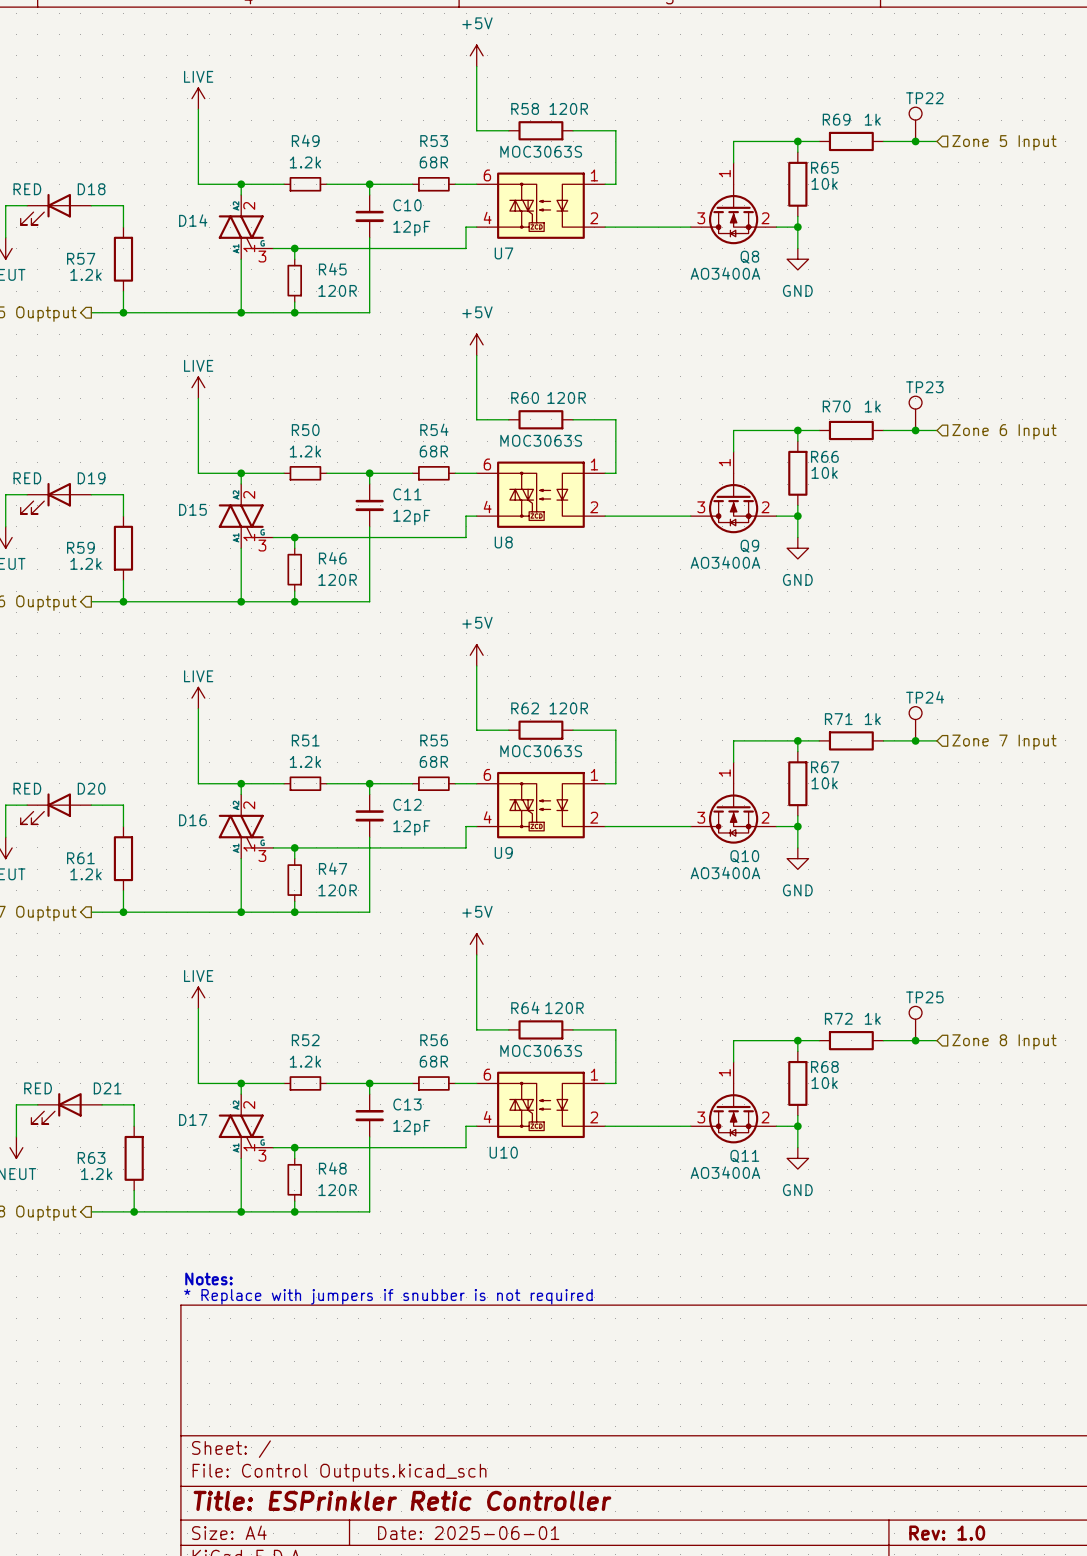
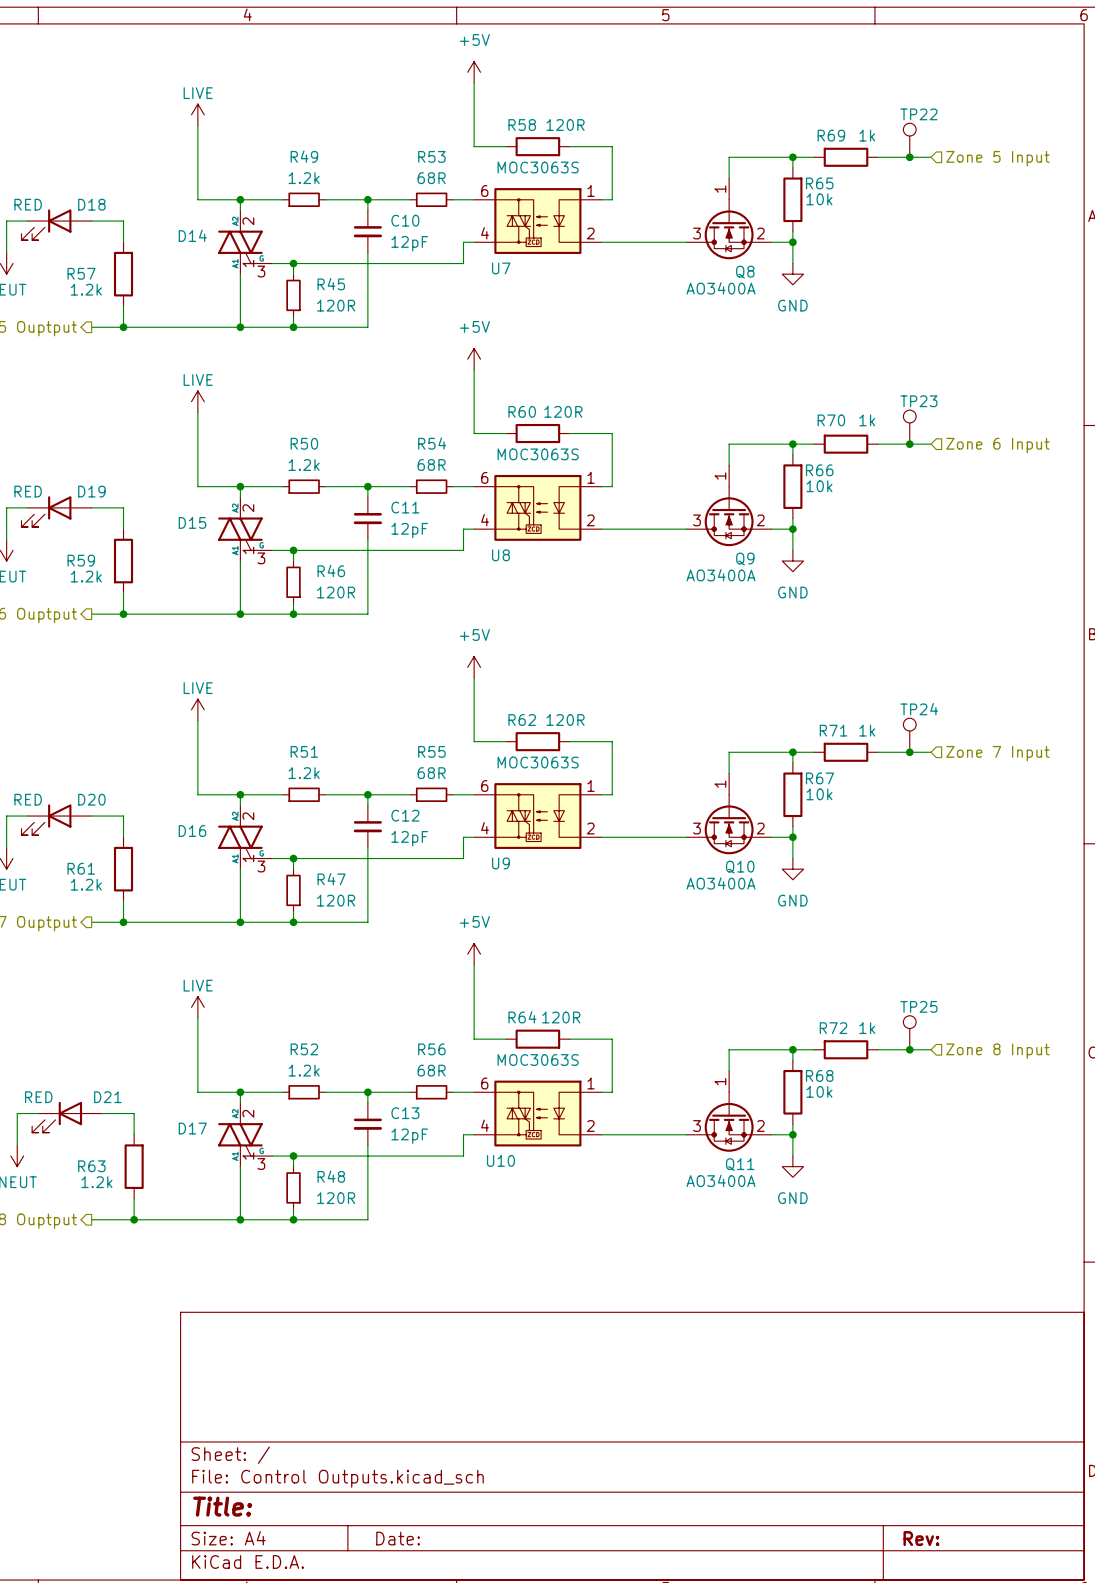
text: Notes: (208, 1278) -> none
text: * Replace with jumpers if snubber is not required (388, 1296) -> none
title block: Title: ESPrinkler Retic Controller (402, 1500) -> Title: (222, 1506)
title block: Date: 2025-06-01 (468, 1533) -> Date: (398, 1538)
title block: Rev: 1.0 (947, 1533) -> Rev: (921, 1538)

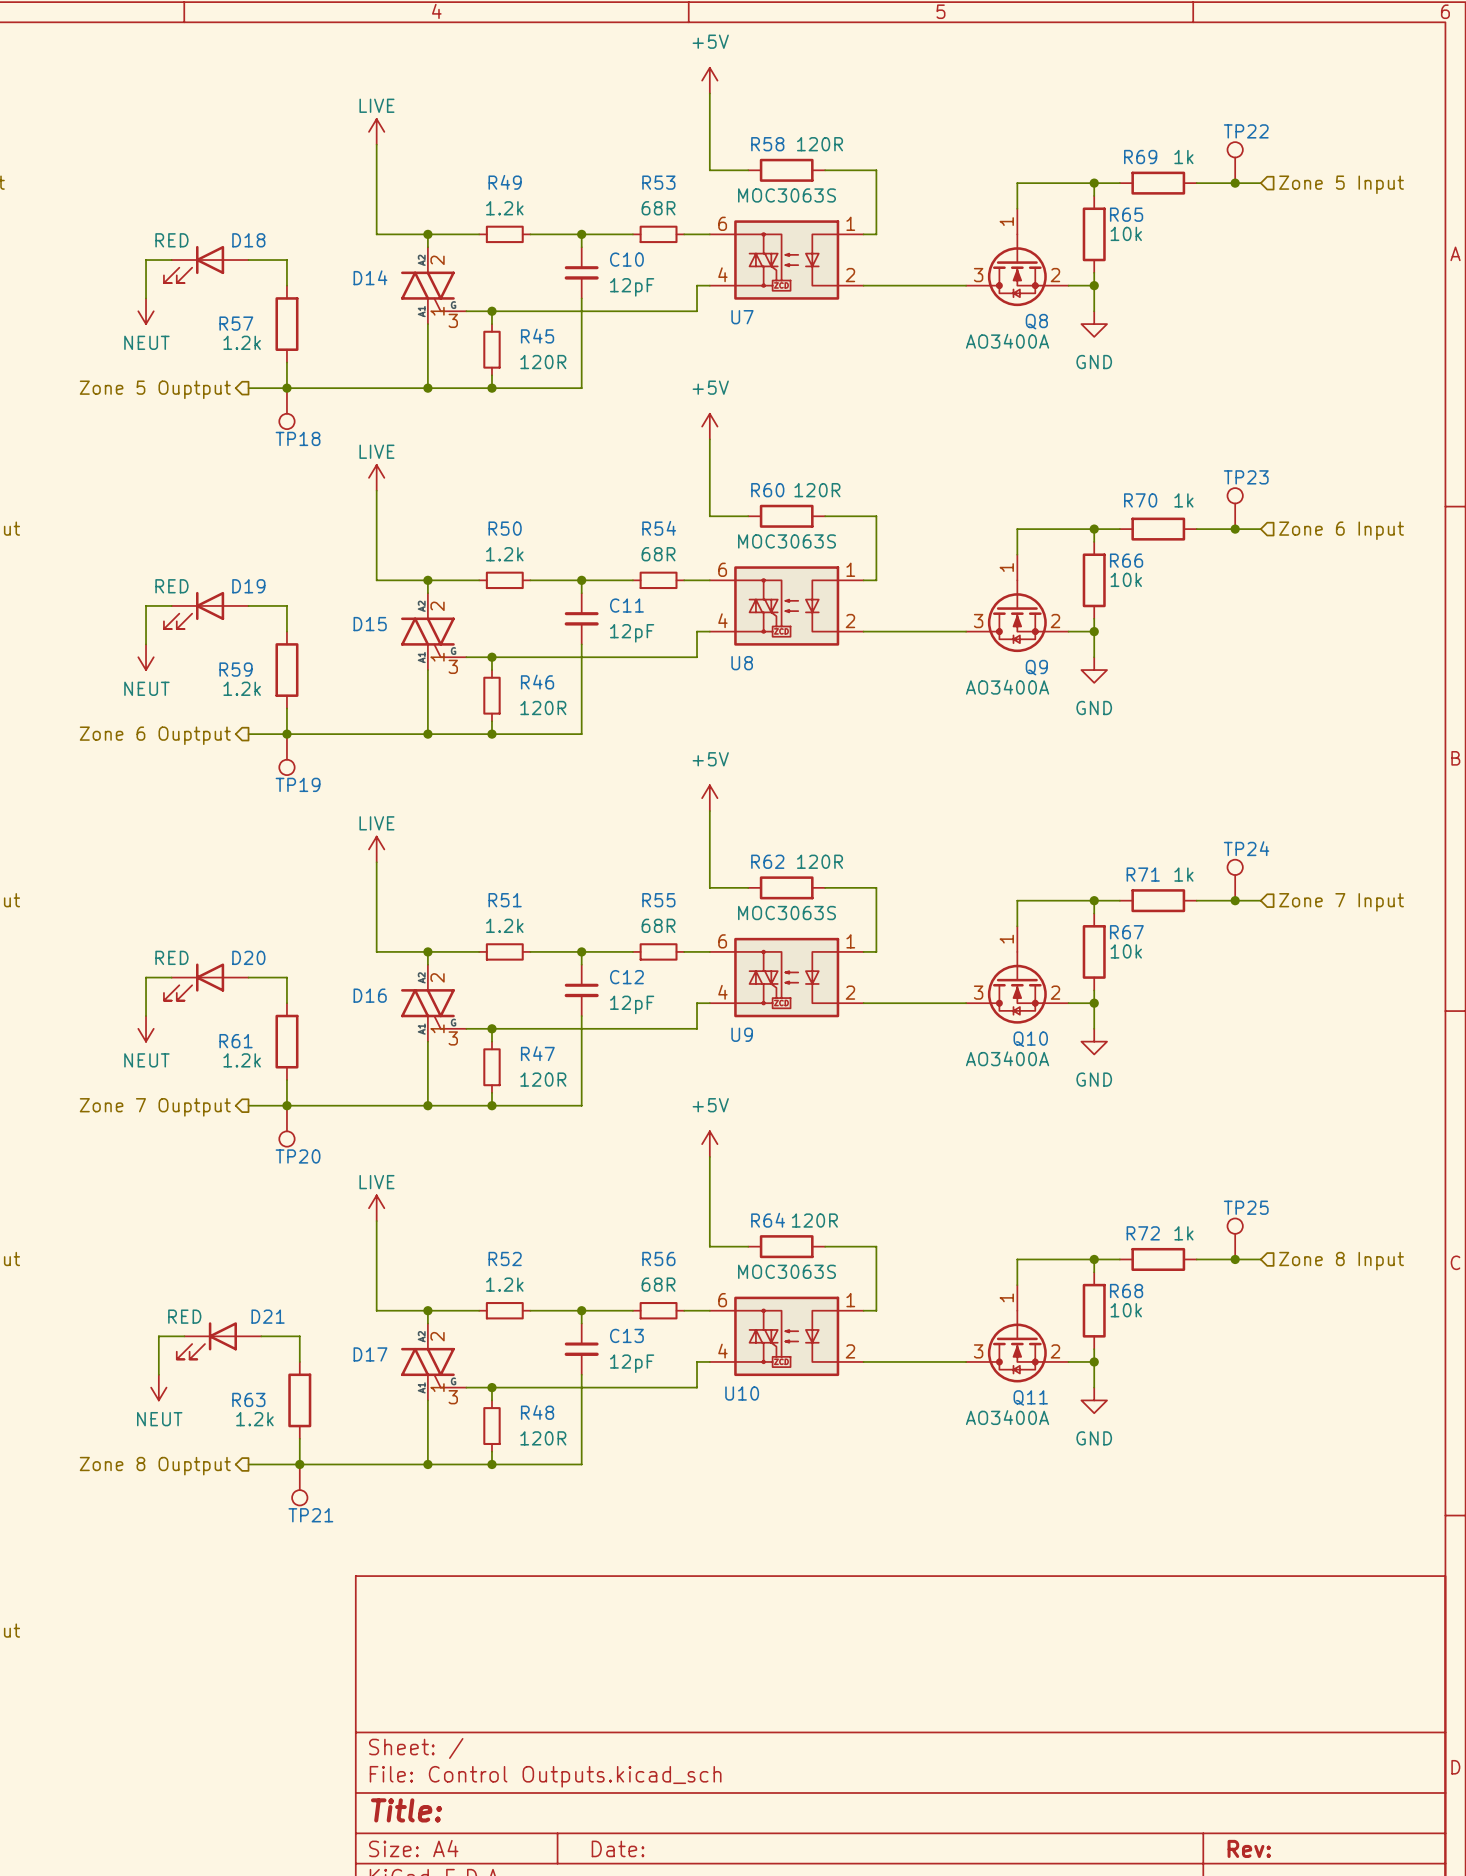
TP18: none -> (286, 408)
TP19: none -> (286, 754)
TP20: none -> (286, 1126)
TP21: none -> (299, 1484)

